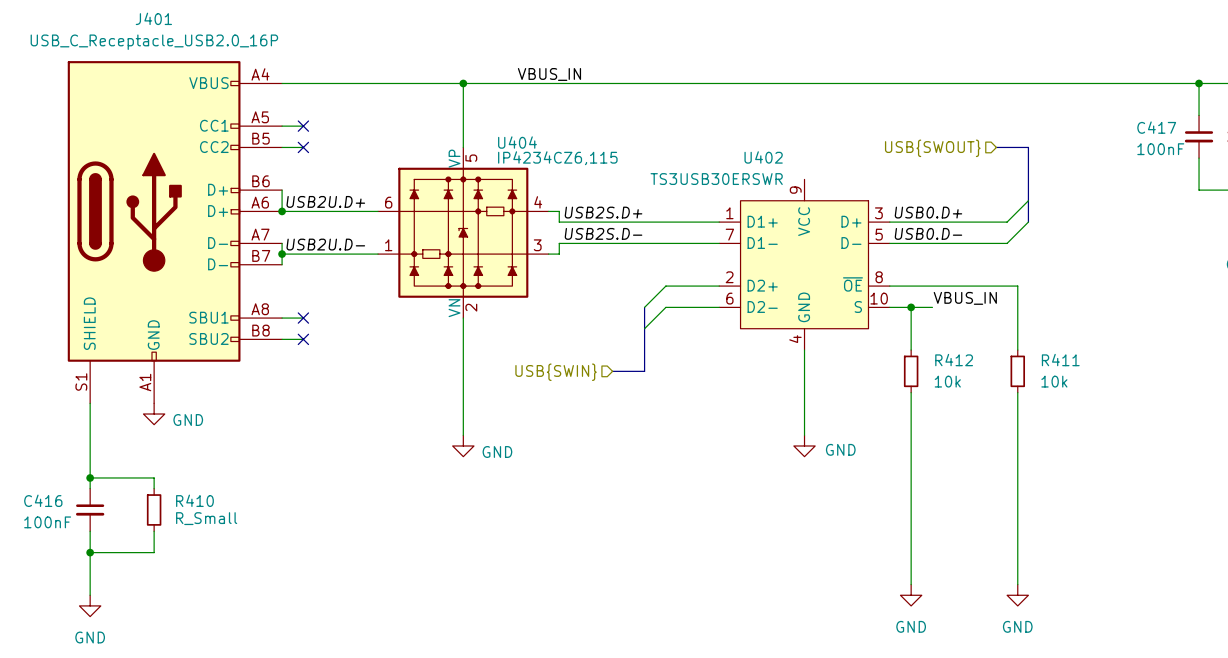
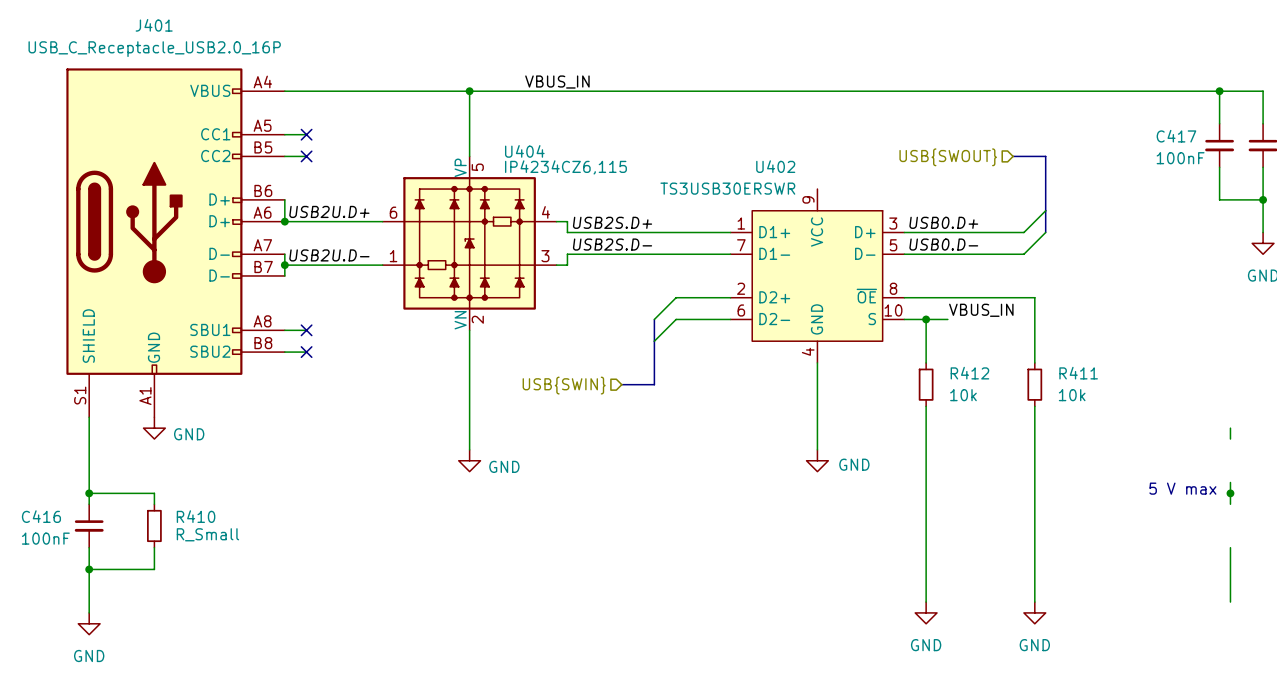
wire: none -> (1230, 428) (1230, 439)
wire: none -> (1230, 482) (1230, 504)
text: none -> 5 V max (1182, 488)
junction: none -> (1230, 493)
wire: none -> (1230, 547) (1230, 602)

